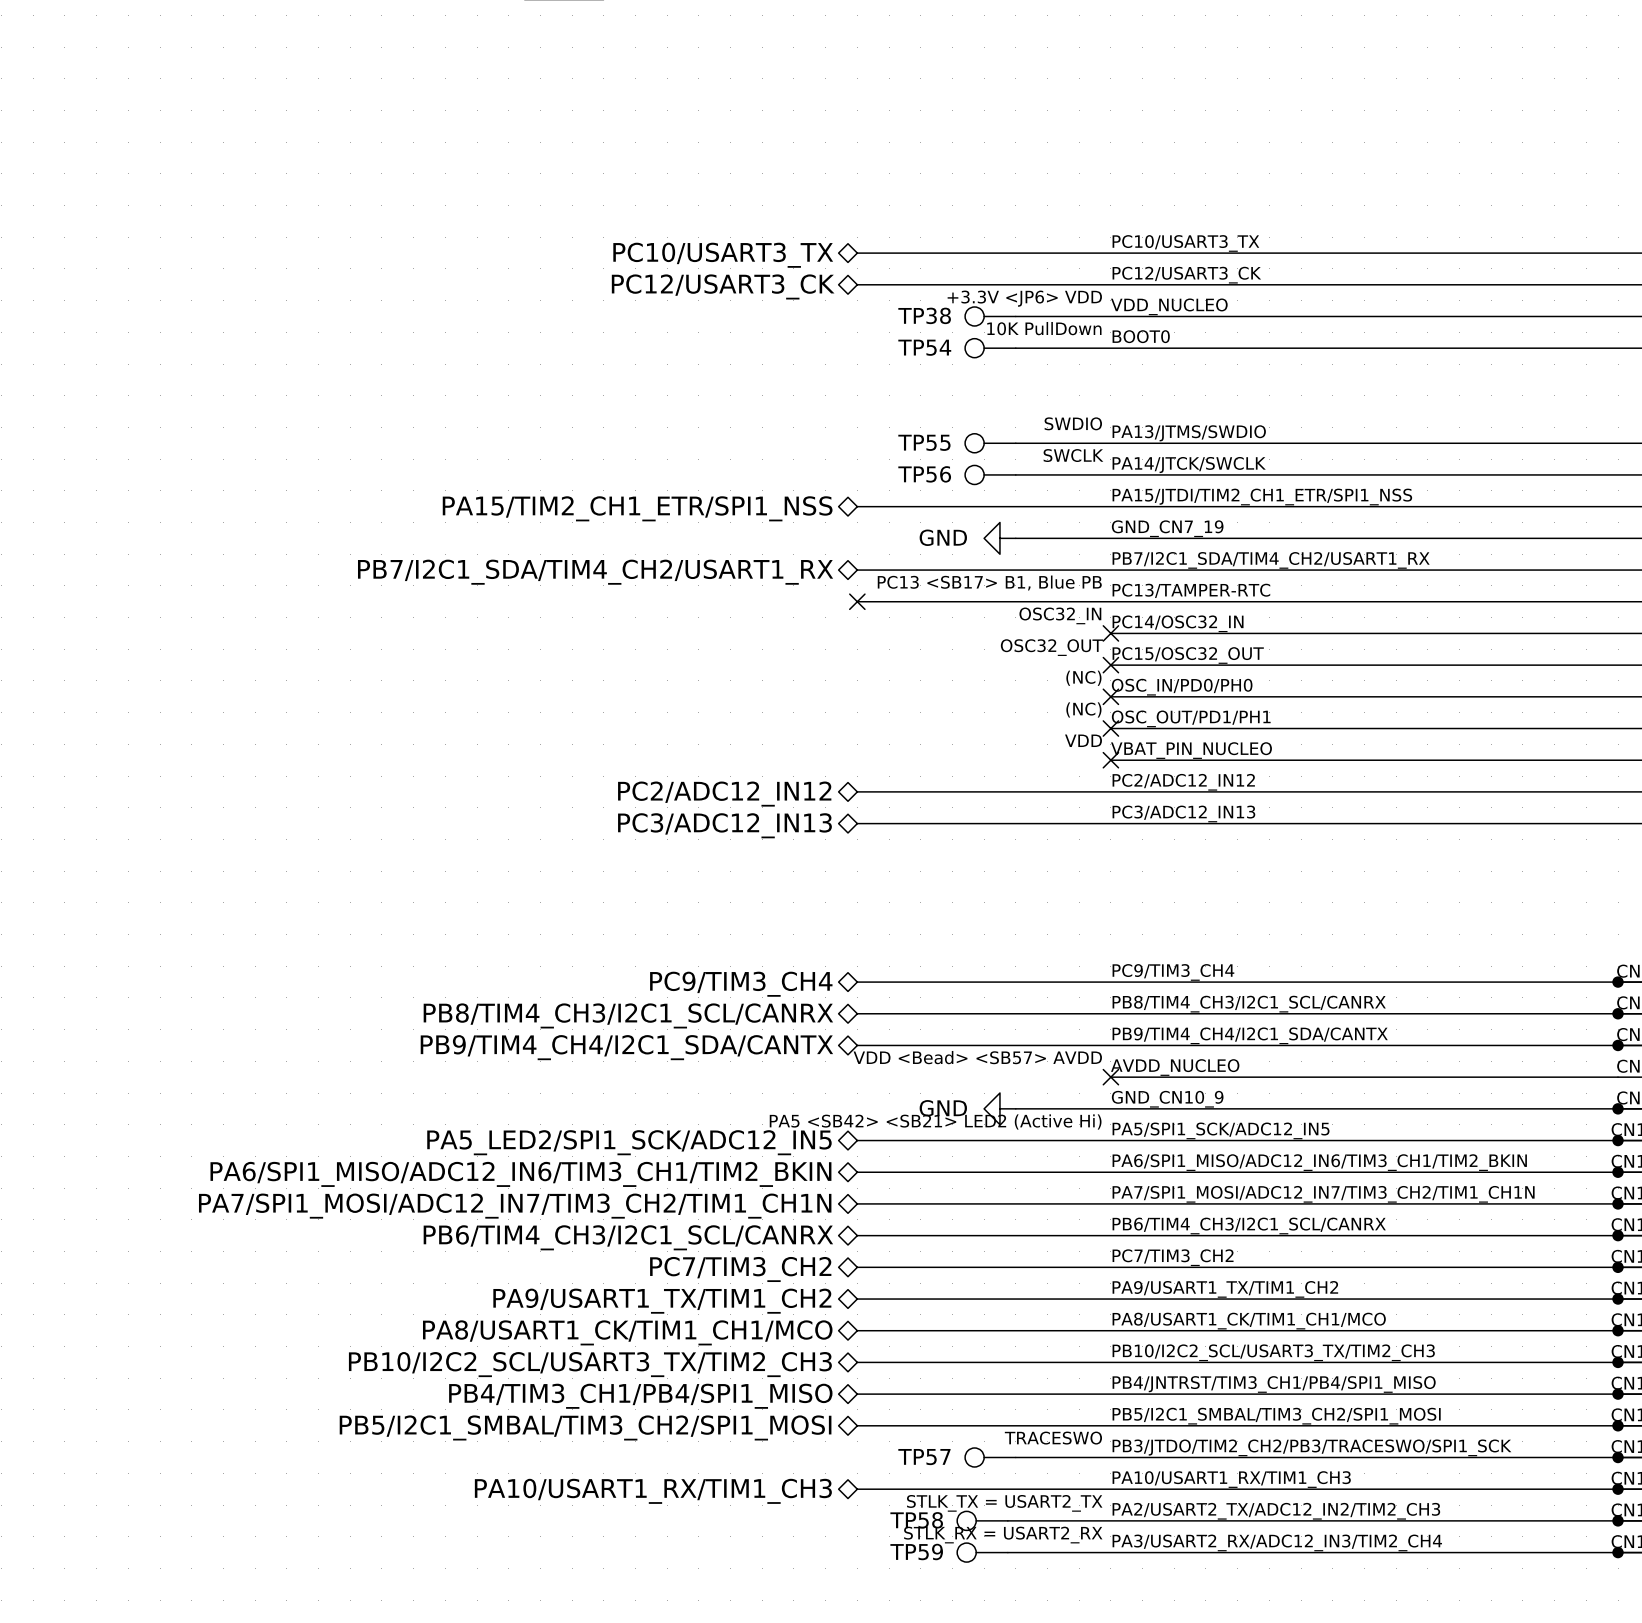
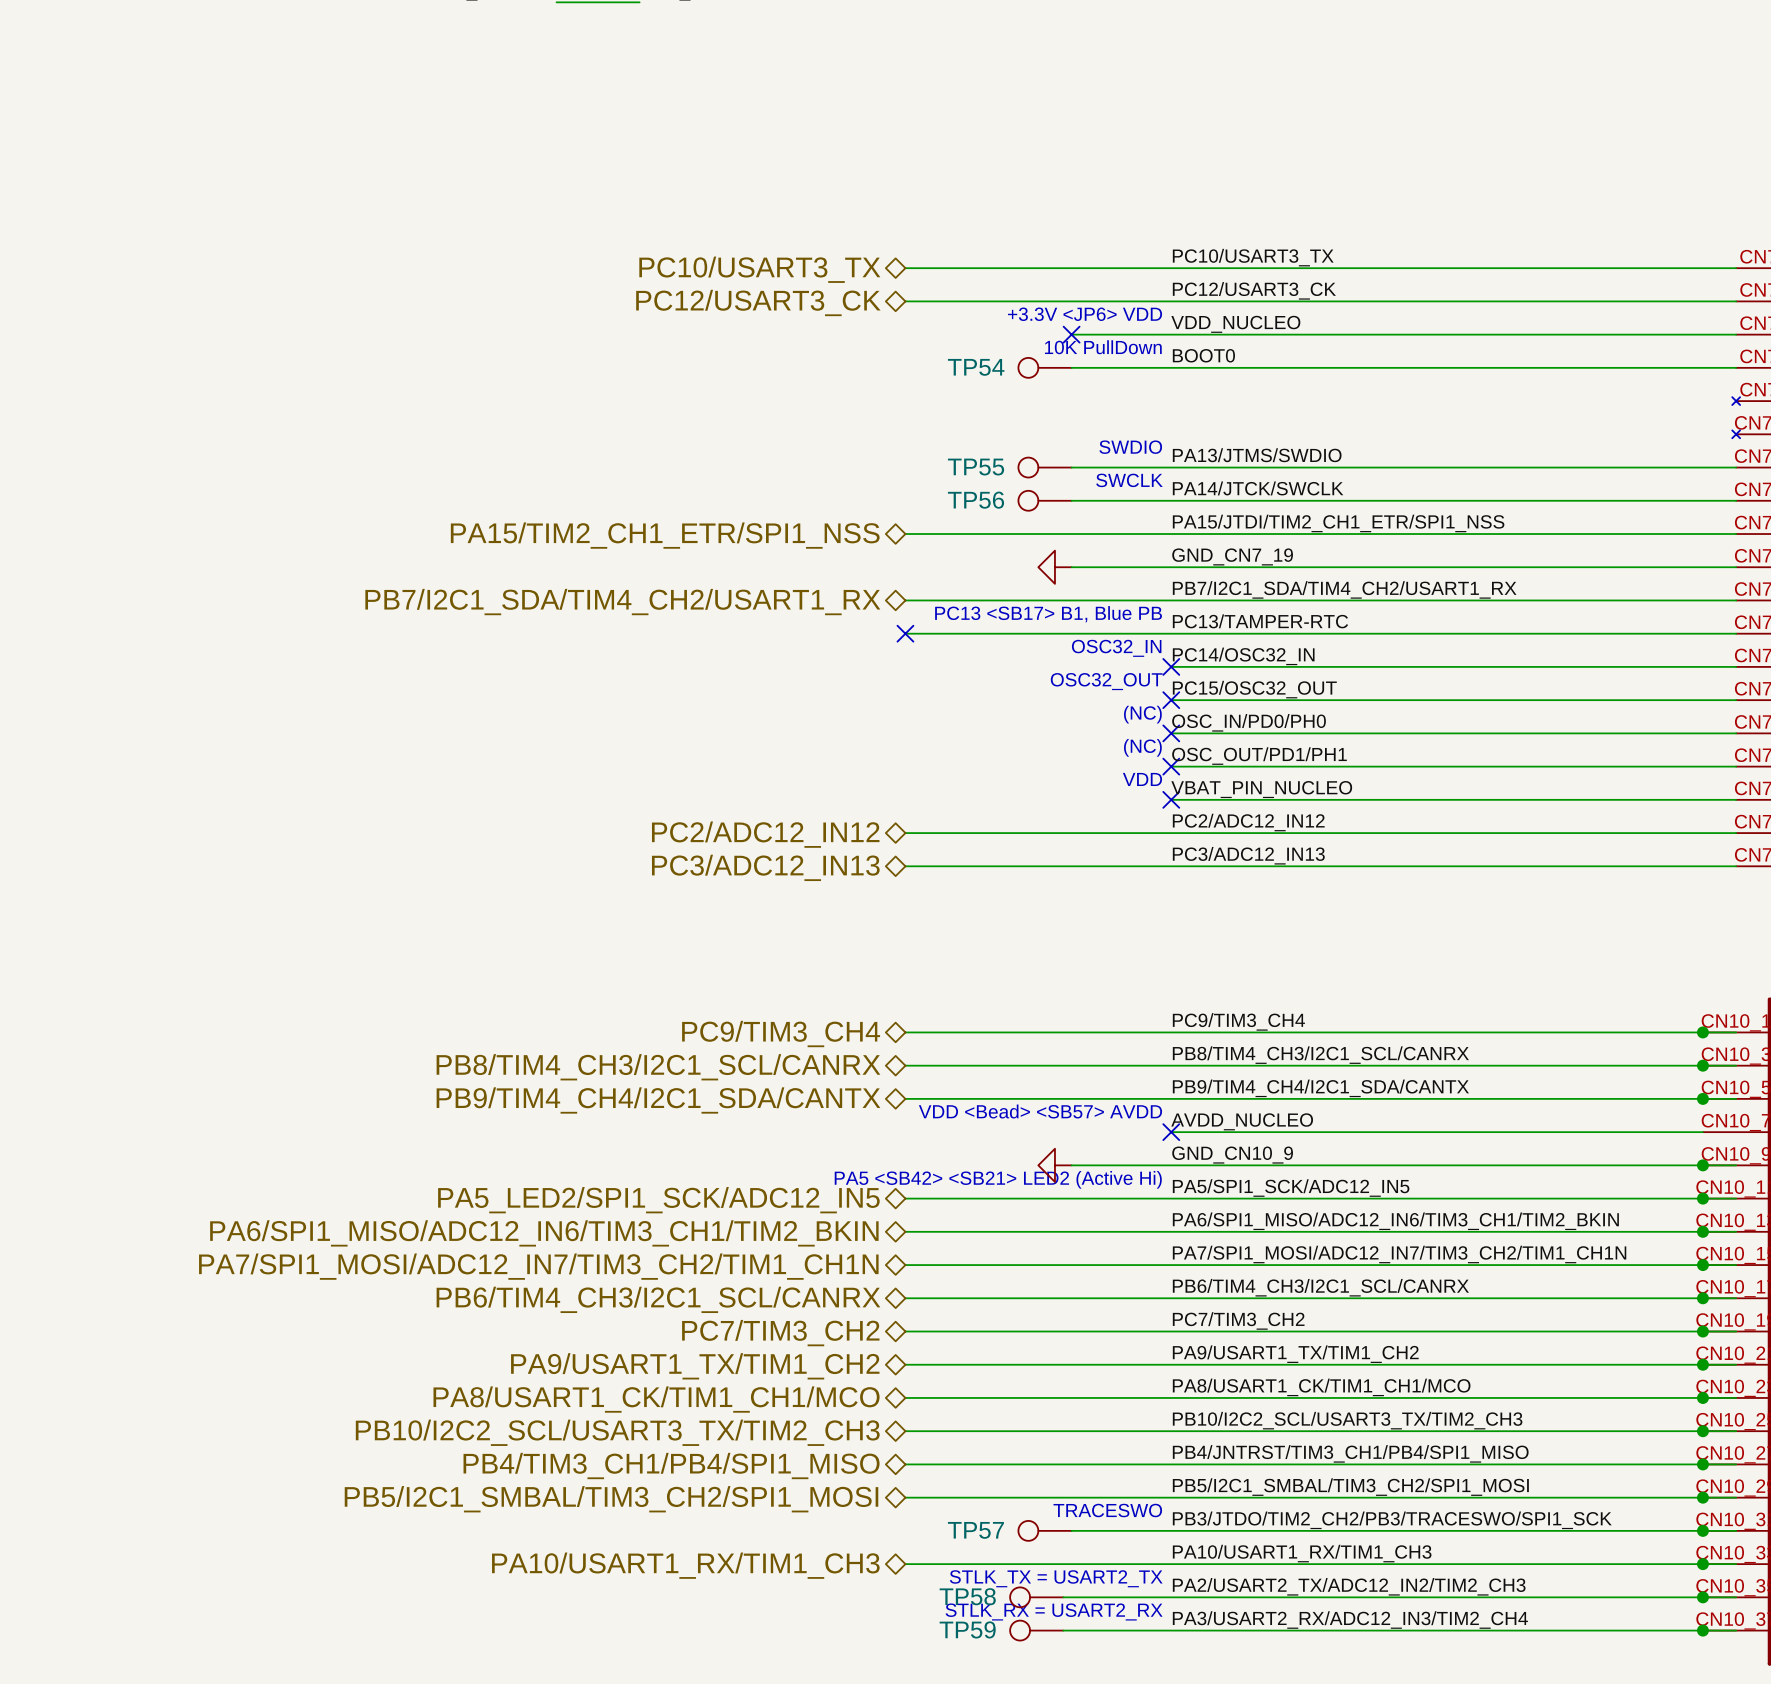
TP38: (990, 316) -> none
no-connect mark: none -> (1071, 334)
power symbol text: GND (943, 537) -> none
power symbol text: GND (943, 1108) -> none

